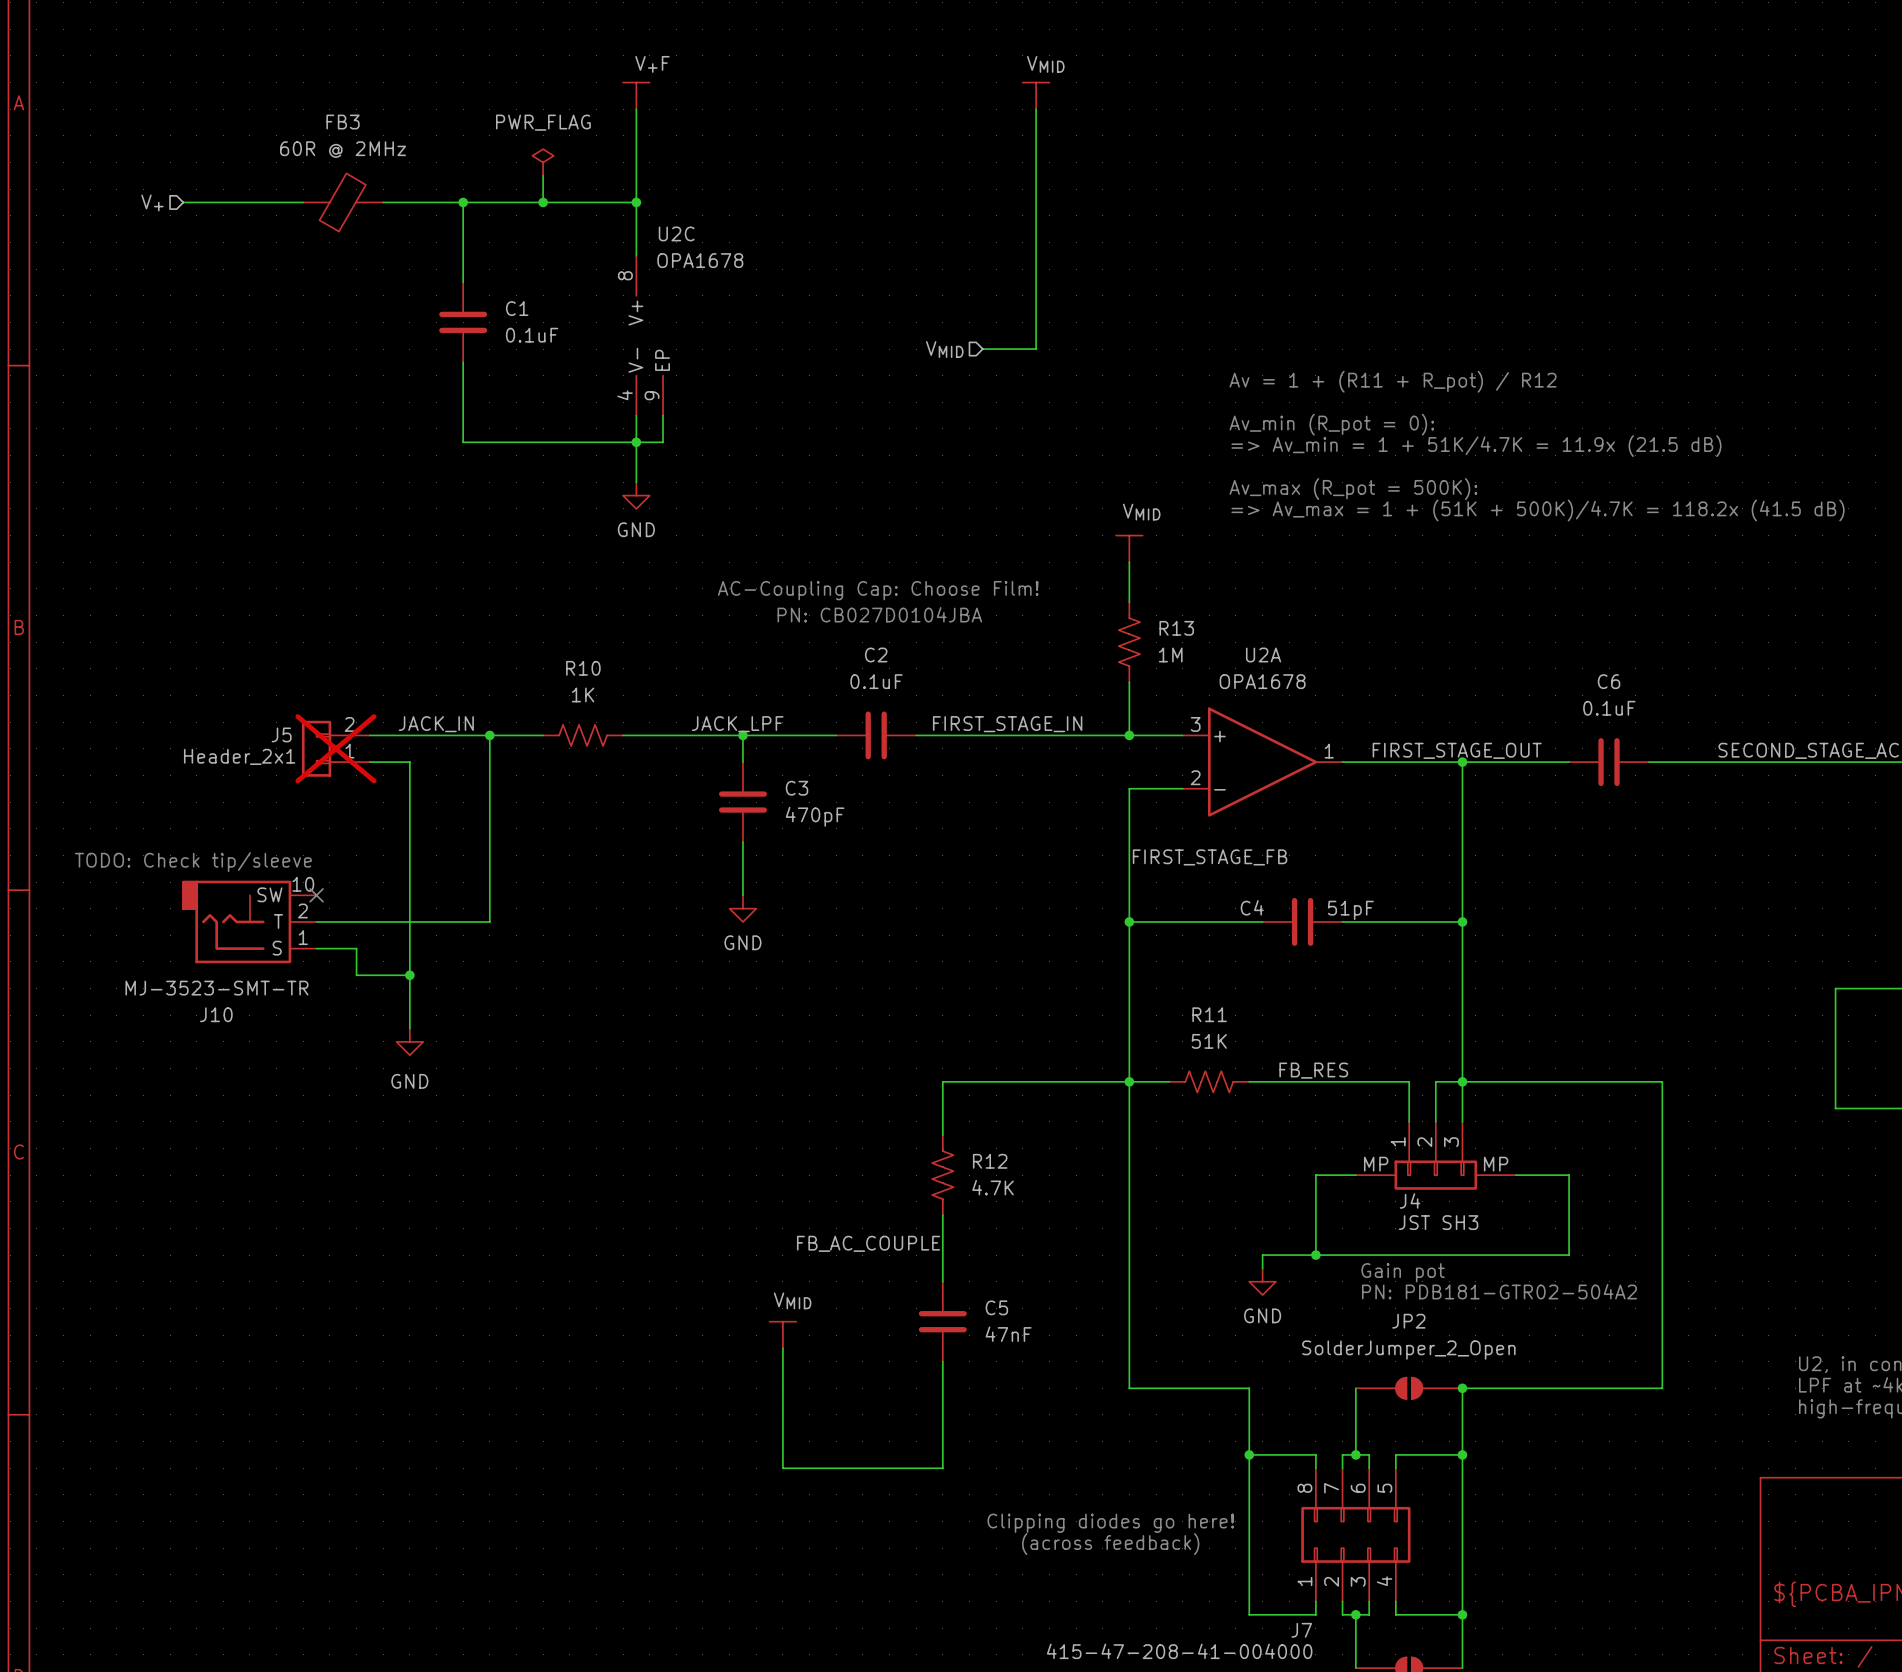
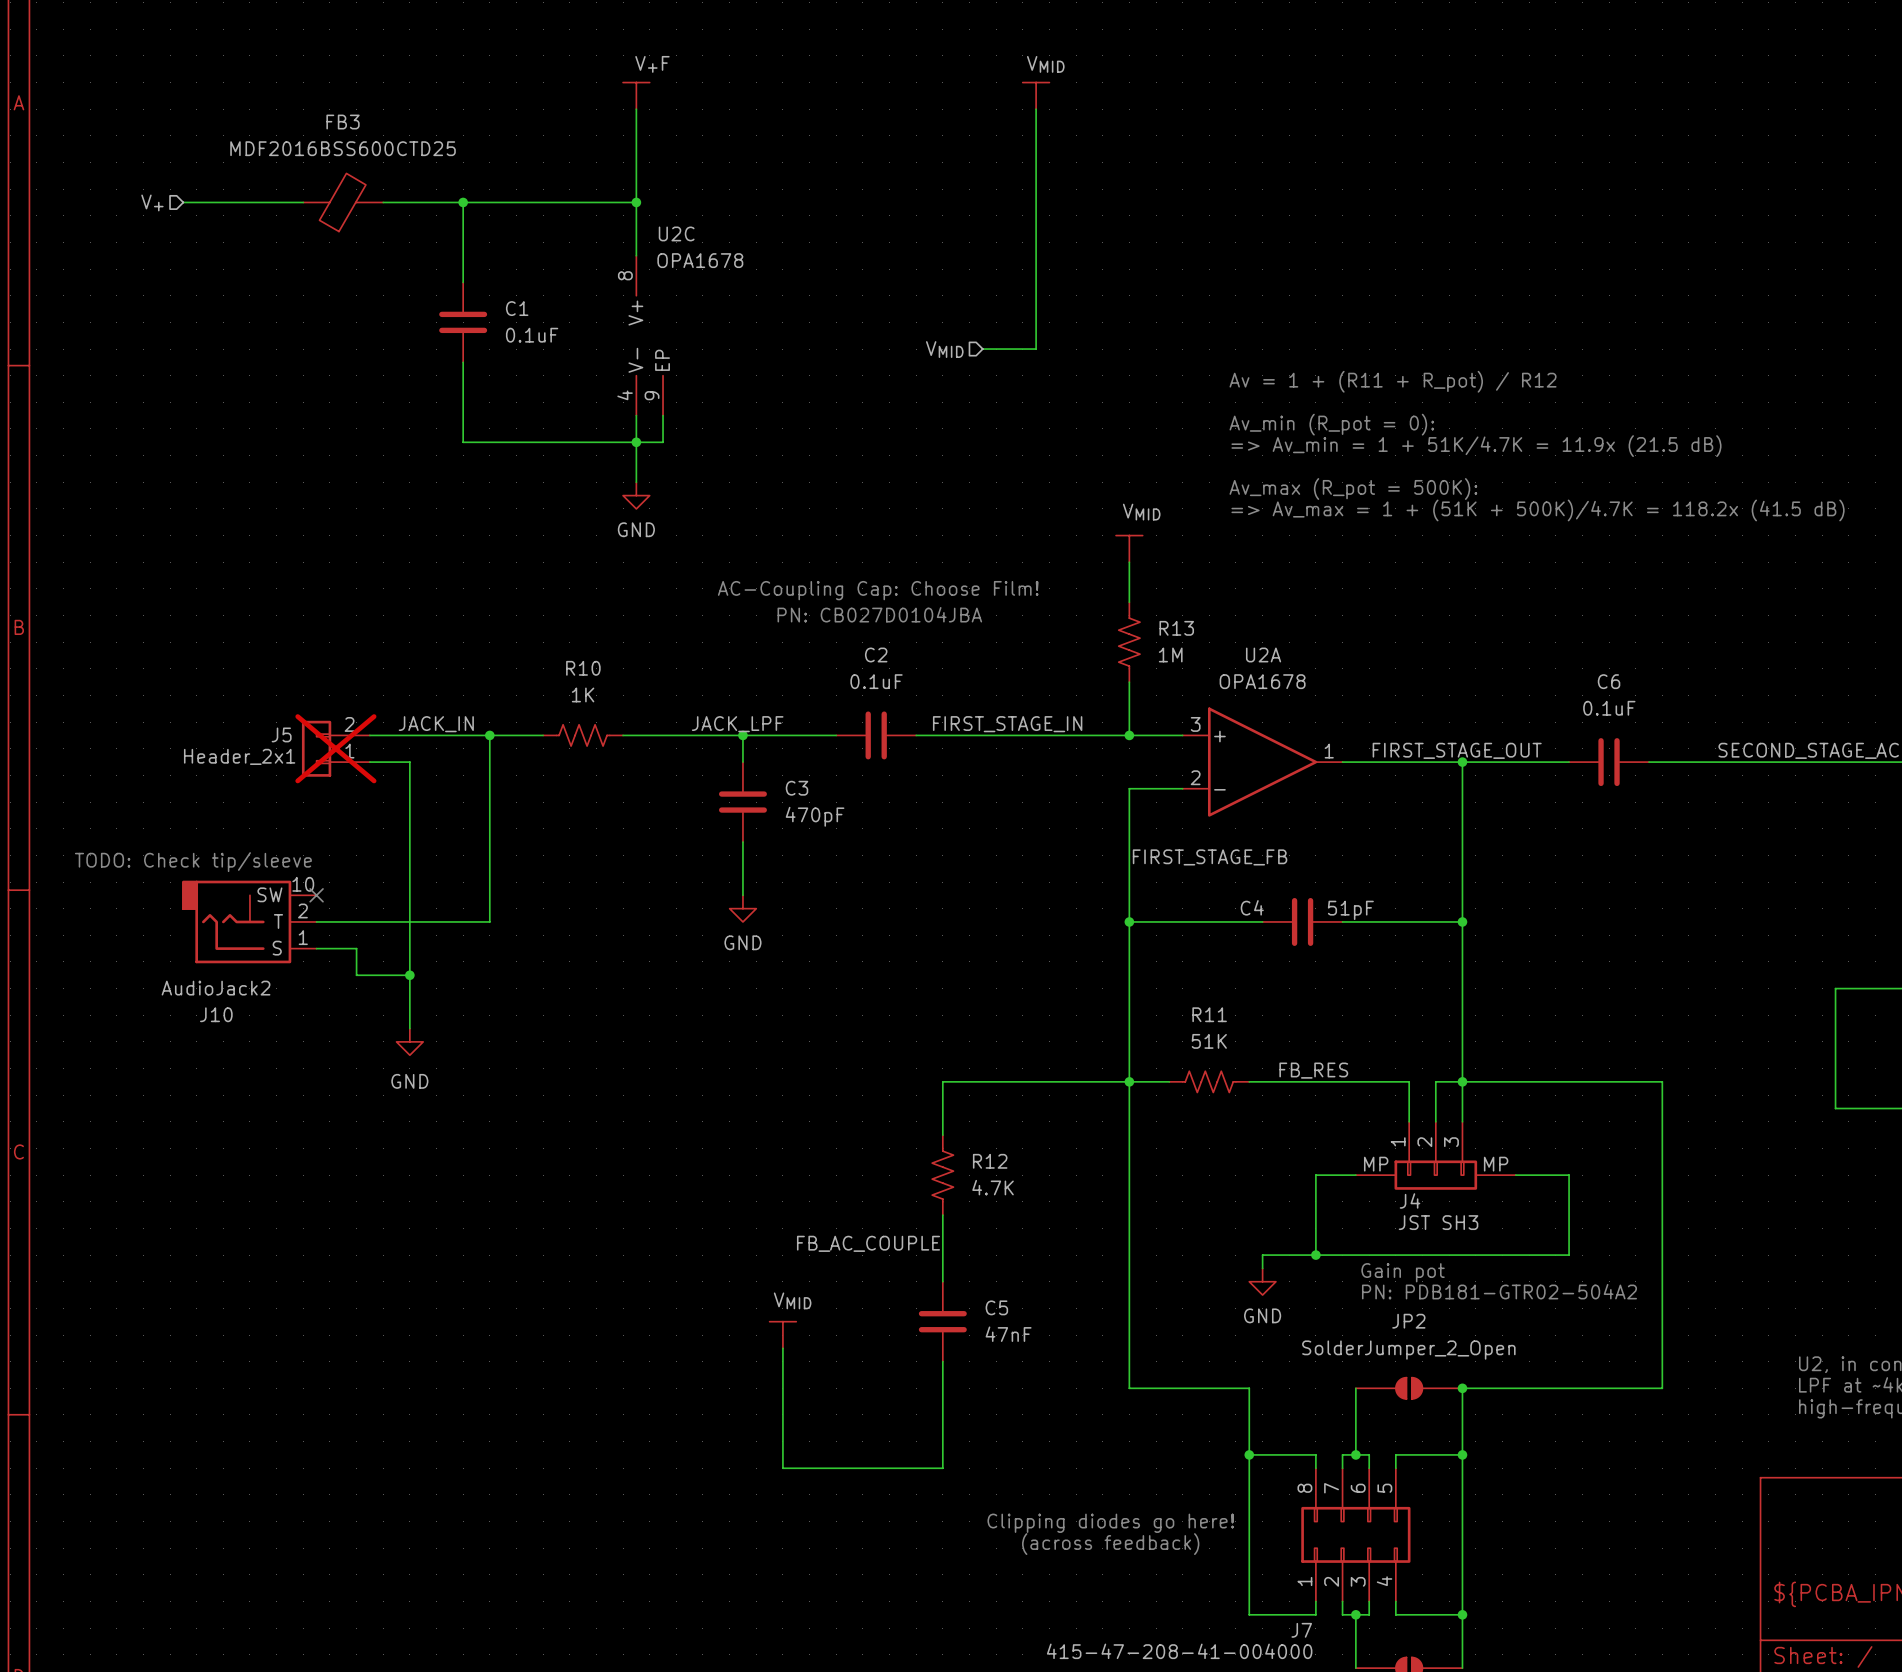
FB3 value: 60R @ 2MHz (343, 149) -> MDF2016BSS600CTD25 (343, 148)
power symbol: PWR_FLAG (543, 162) -> none
wire: (543, 175) (543, 202) -> none
junction: (543, 202) -> none
J10 value: MJ-3523-SMT-TR (216, 988) -> AudioJack2 (216, 988)

